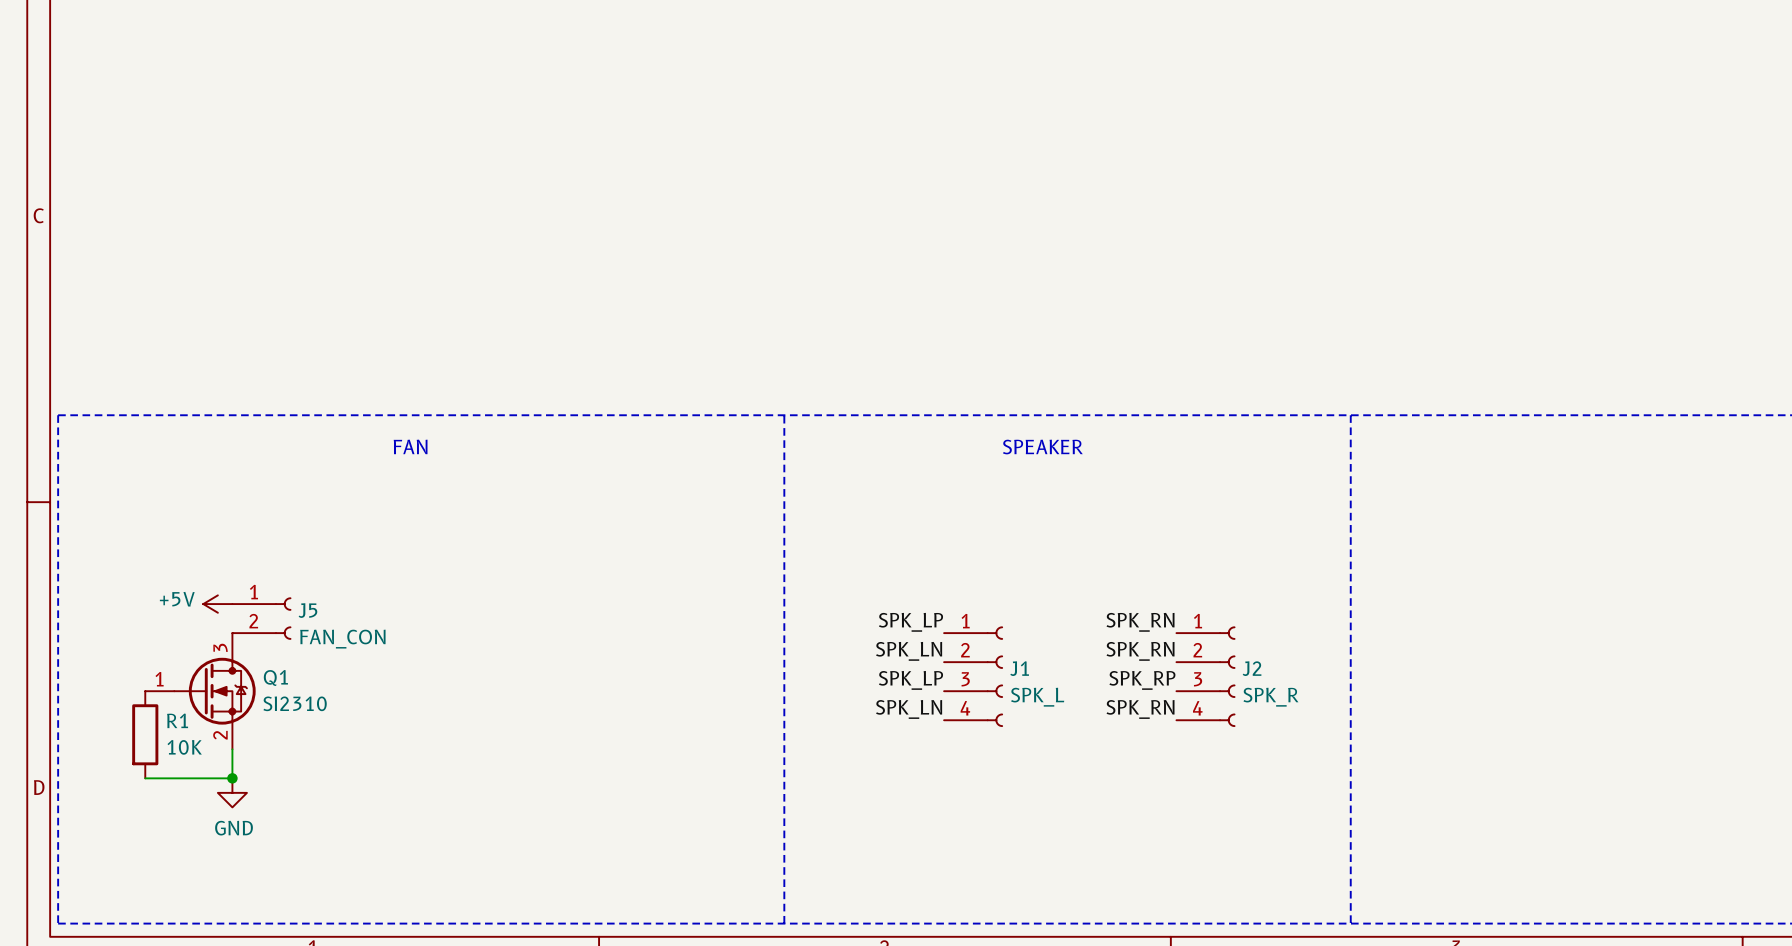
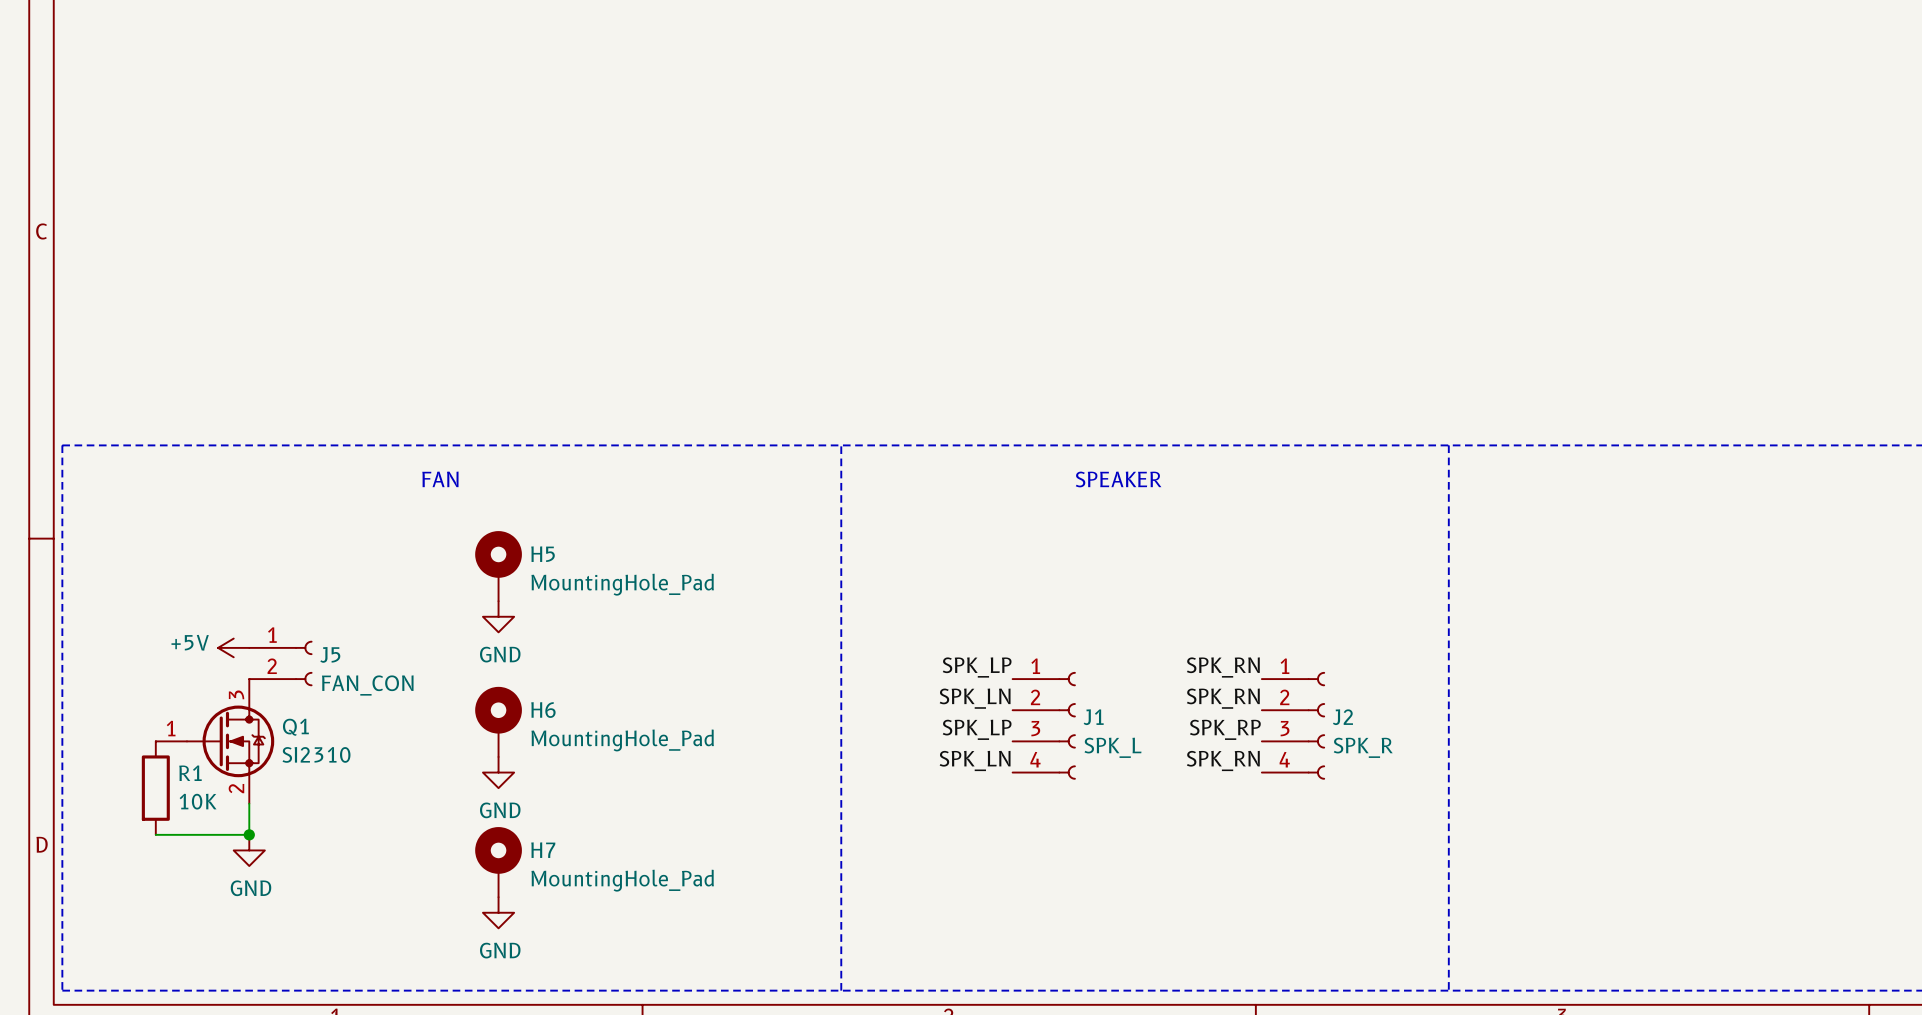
H5: none -> MountingHole_Pad (498, 566)
power symbol: none -> GND (498, 616)
H6: none -> MountingHole_Pad (498, 721)
power symbol: none -> GND (498, 772)
H7: none -> MountingHole_Pad (498, 862)
power symbol: none -> GND (498, 912)

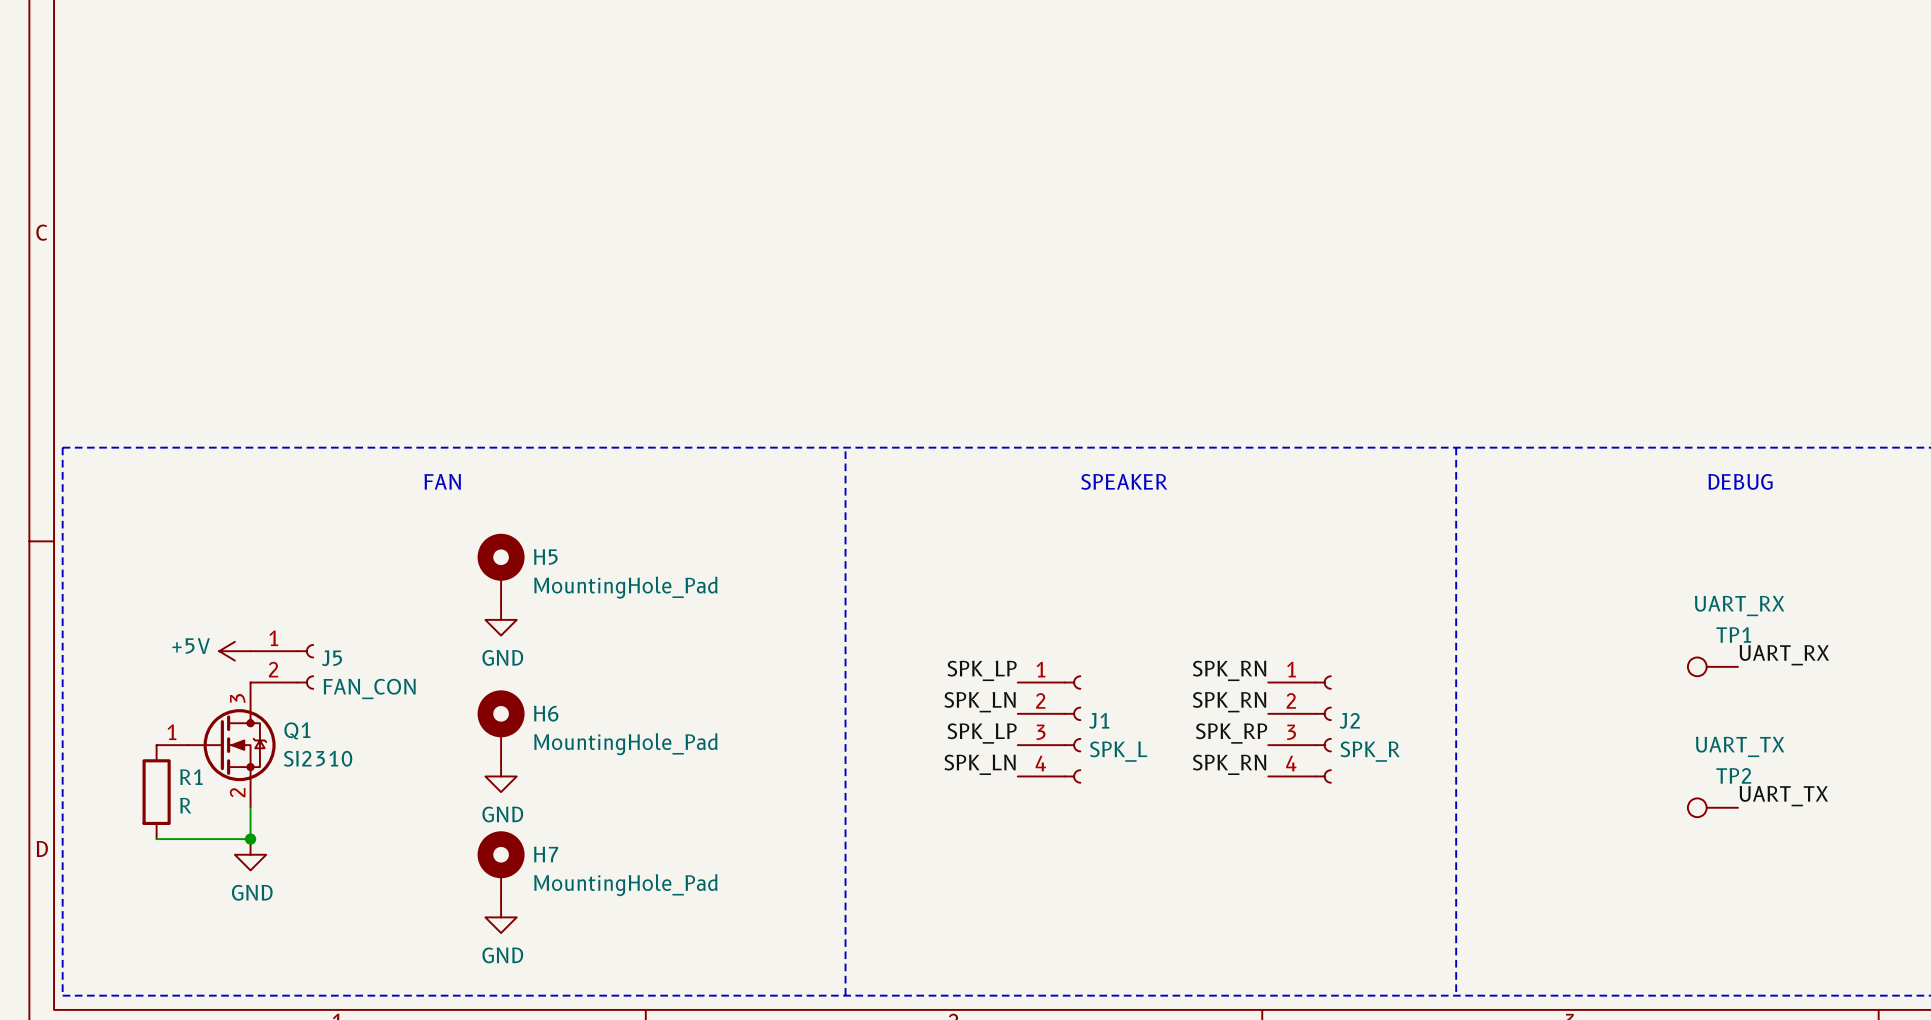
text: none -> DEBUG (1740, 481)
label: none -> UART_RX (1784, 655)
TP1: none -> UART_RX (1712, 666)
label: none -> UART_TX (1783, 796)
R1 value: 10K (198, 801) -> R (185, 805)
TP2: none -> UART_TX (1712, 807)

